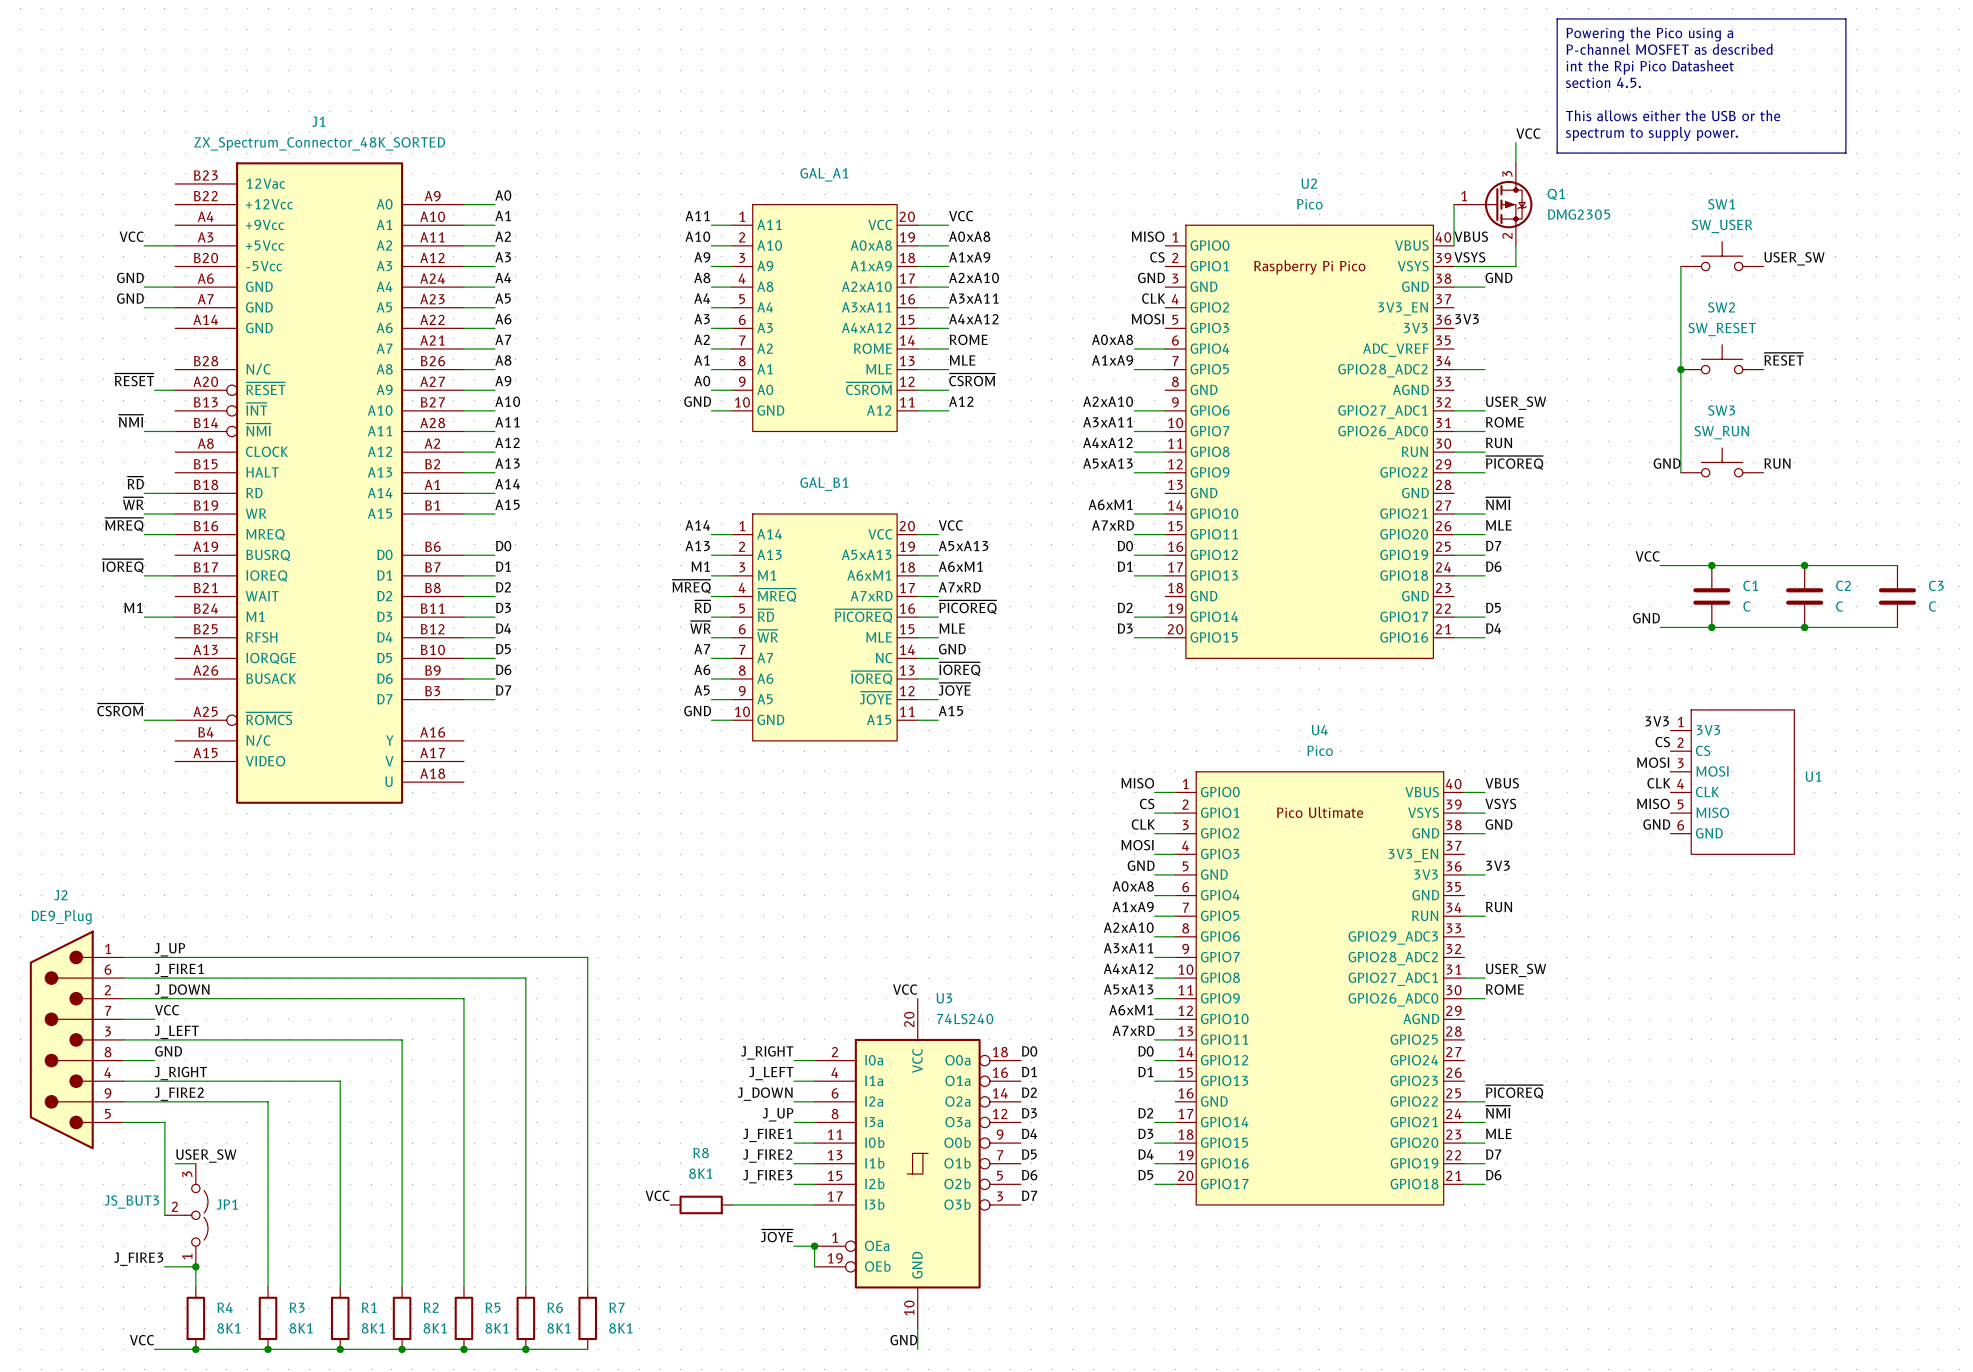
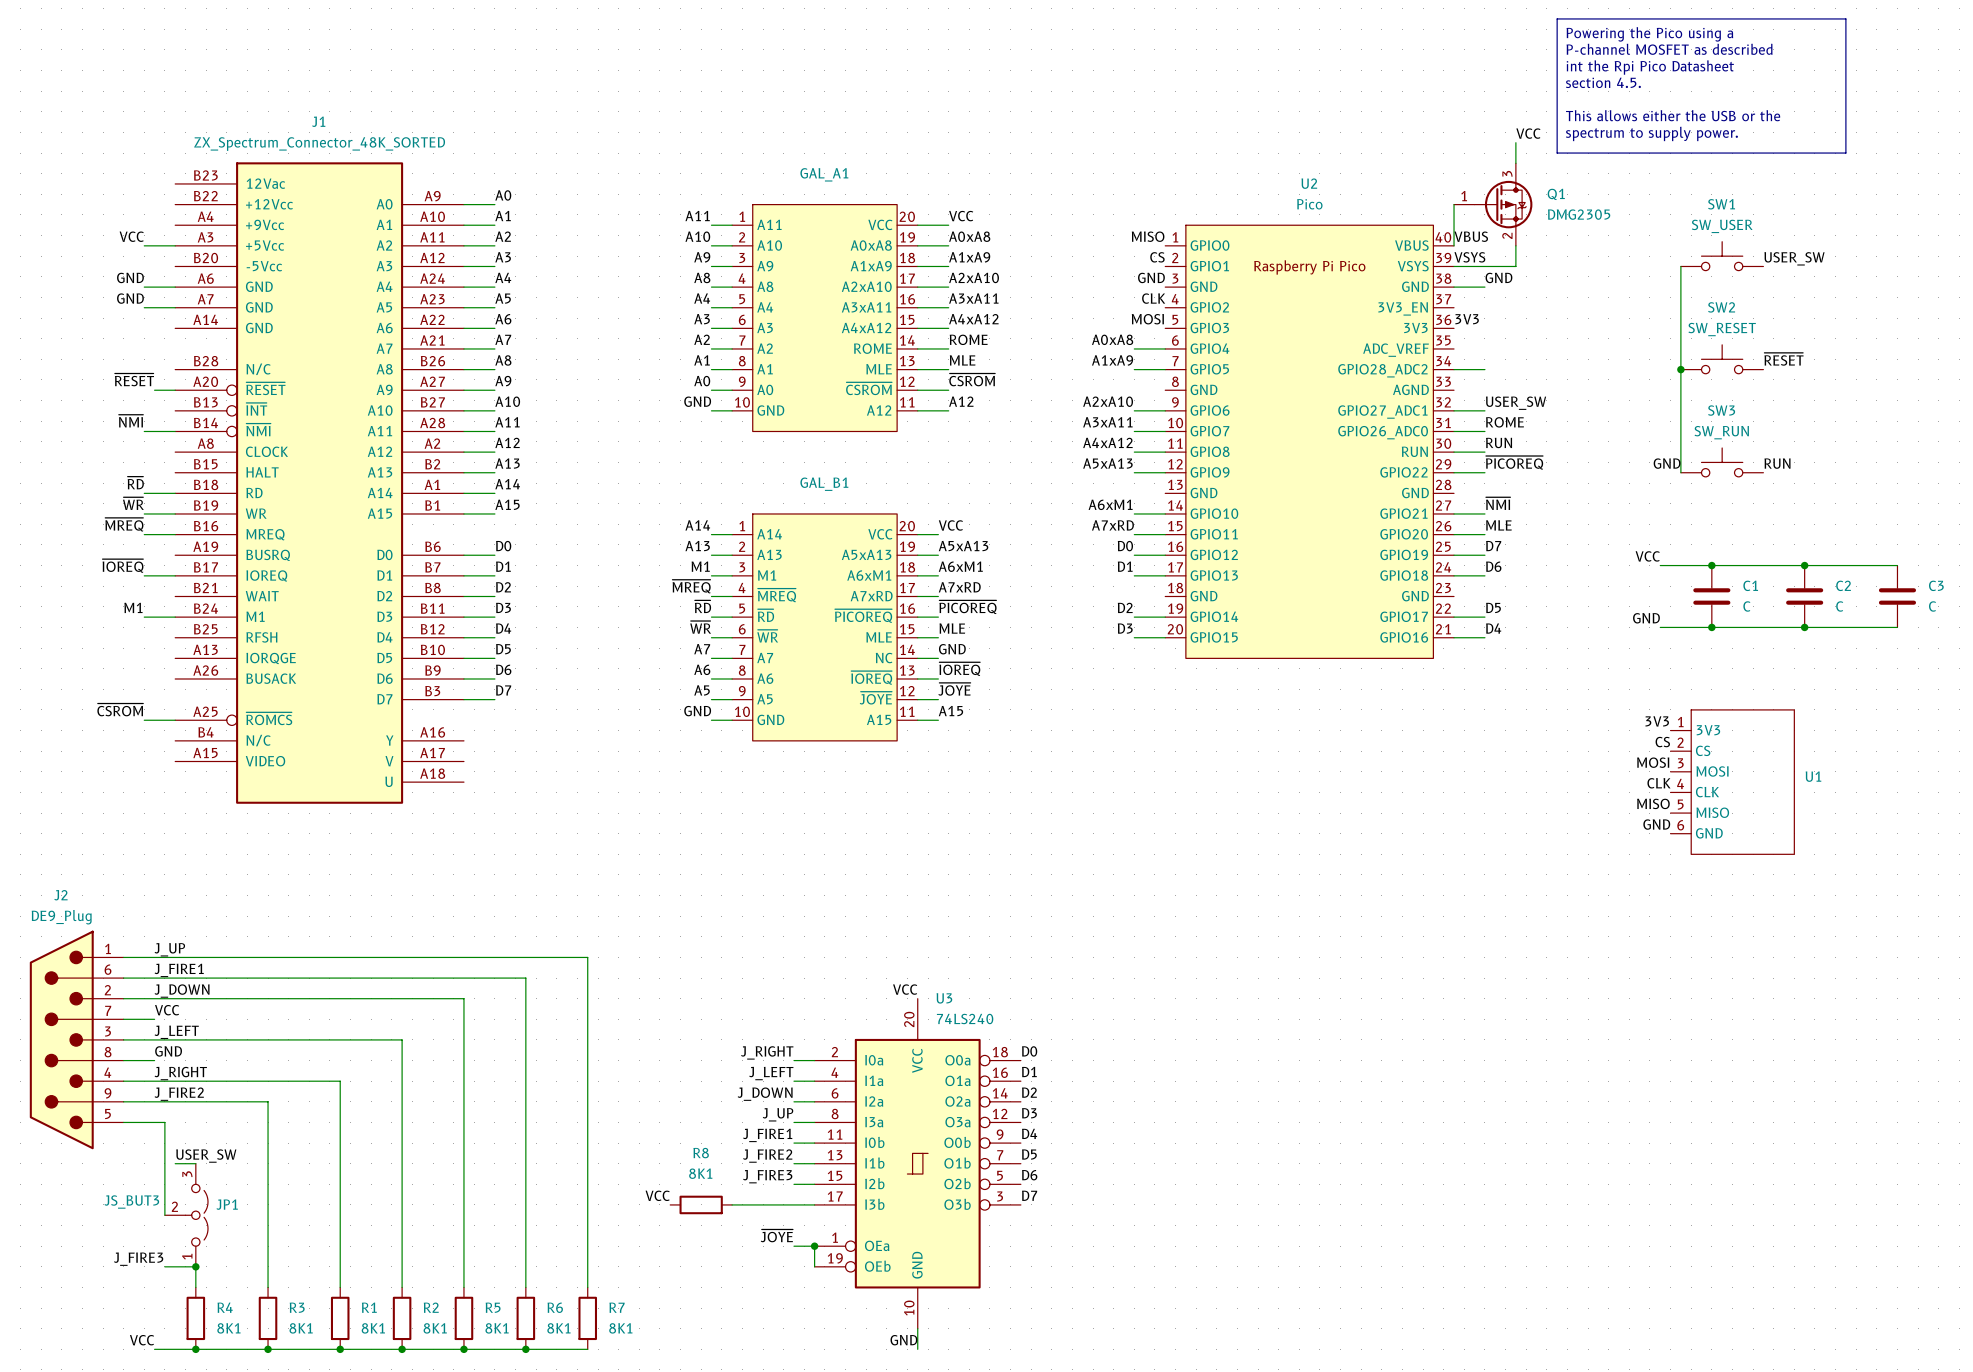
label: MISO (1137, 783) -> none
label: VBUS (1502, 783) -> none
wire: (1154, 792) (1175, 792) -> none
wire: (1464, 792) (1484, 792) -> none
label: CS (1147, 803) -> none
label: VSYS (1500, 803) -> none
wire: (1154, 813) (1175, 813) -> none
wire: (1464, 813) (1484, 813) -> none
label: CLK (1143, 824) -> none
label: GND (1498, 824) -> none
wire: (1154, 833) (1175, 833) -> none
wire: (1464, 833) (1484, 833) -> none
label: MOSI (1137, 845) -> none
wire: (1154, 854) (1175, 854) -> none
label: GND (1141, 865) -> none
label: 3V3 (1498, 865) -> none
wire: (1154, 874) (1175, 874) -> none
wire: (1464, 874) (1484, 874) -> none
label: A0xA8 (1133, 886) -> none
wire: (1154, 895) (1175, 895) -> none
label: A1xA9 (1133, 907) -> none
label: RUN (1499, 907) -> none
wire: (1154, 916) (1175, 916) -> none
wire: (1464, 916) (1484, 916) -> none
label: A2xA10 (1128, 927) -> none
wire: (1154, 936) (1175, 936) -> none
label: A3xA11 (1128, 948) -> none
wire: (1154, 957) (1175, 957) -> none
label: A4xA12 (1128, 968) -> none
label: USER_SW (1516, 970) -> none
wire: (1154, 978) (1175, 978) -> none
wire: (1464, 978) (1484, 978) -> none
U4: Pico (1319, 988) -> none
label: A5xA13 (1128, 989) -> none
label: ROME (1504, 989) -> none
wire: (1154, 998) (1175, 998) -> none
wire: (1464, 998) (1484, 998) -> none
label: A6xM1 (1131, 1010) -> none
wire: (1154, 1019) (1175, 1019) -> none
label: A7xRD (1133, 1030) -> none
wire: (1154, 1039) (1175, 1039) -> none
label: D0 (1146, 1051) -> none
wire: (1154, 1060) (1175, 1060) -> none
label: D1 (1145, 1072) -> none
wire: (1154, 1081) (1175, 1081) -> none
label: ~{PICOREQ} (1514, 1091) -> none
wire: (1464, 1101) (1484, 1101) -> none
label: ~{NMI} (1498, 1112) -> none
label: D2 (1145, 1113) -> none
wire: (1154, 1122) (1175, 1122) -> none
wire: (1464, 1122) (1484, 1122) -> none
label: D3 (1145, 1133) -> none
label: MLE (1498, 1133) -> none
wire: (1154, 1143) (1175, 1143) -> none
wire: (1464, 1143) (1484, 1143) -> none
label: D4 (1146, 1154) -> none
label: D7 (1493, 1154) -> none
wire: (1154, 1163) (1175, 1163) -> none
wire: (1464, 1163) (1484, 1163) -> none
label: D5 (1145, 1175) -> none
label: D6 (1493, 1175) -> none
wire: (1154, 1184) (1175, 1184) -> none
wire: (1464, 1184) (1484, 1184) -> none

